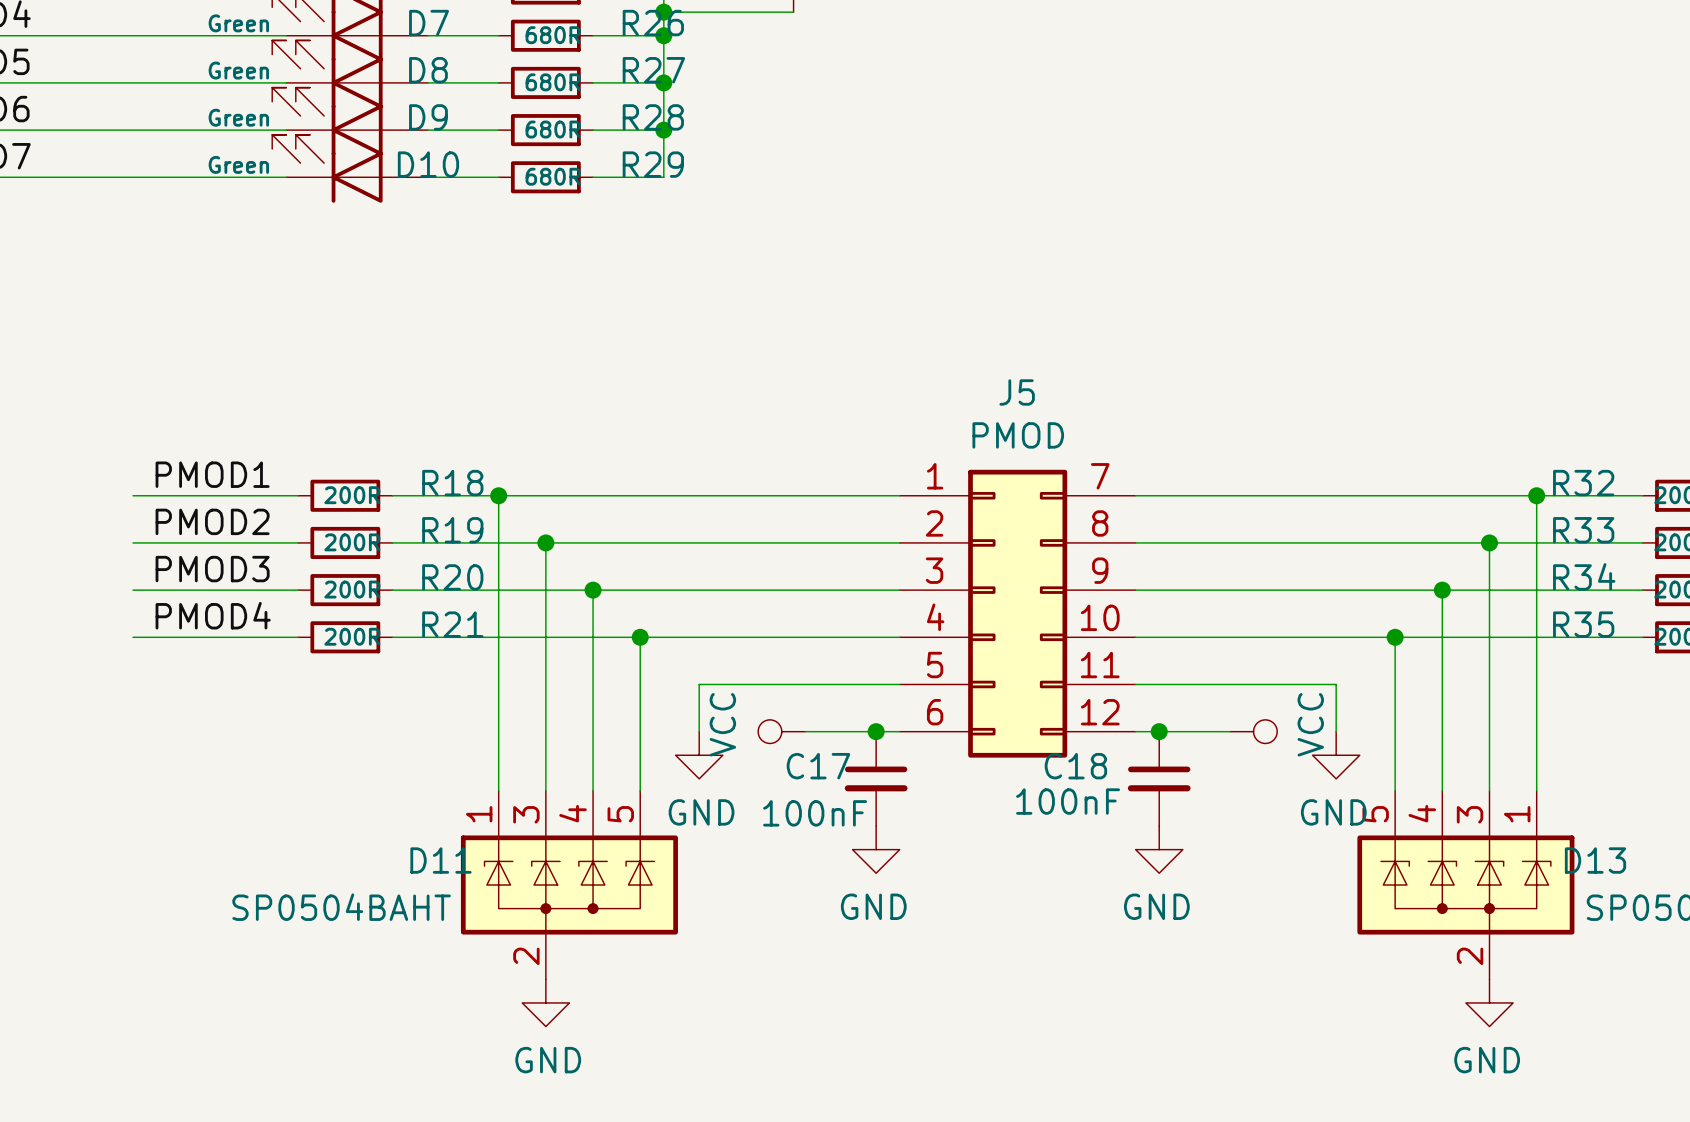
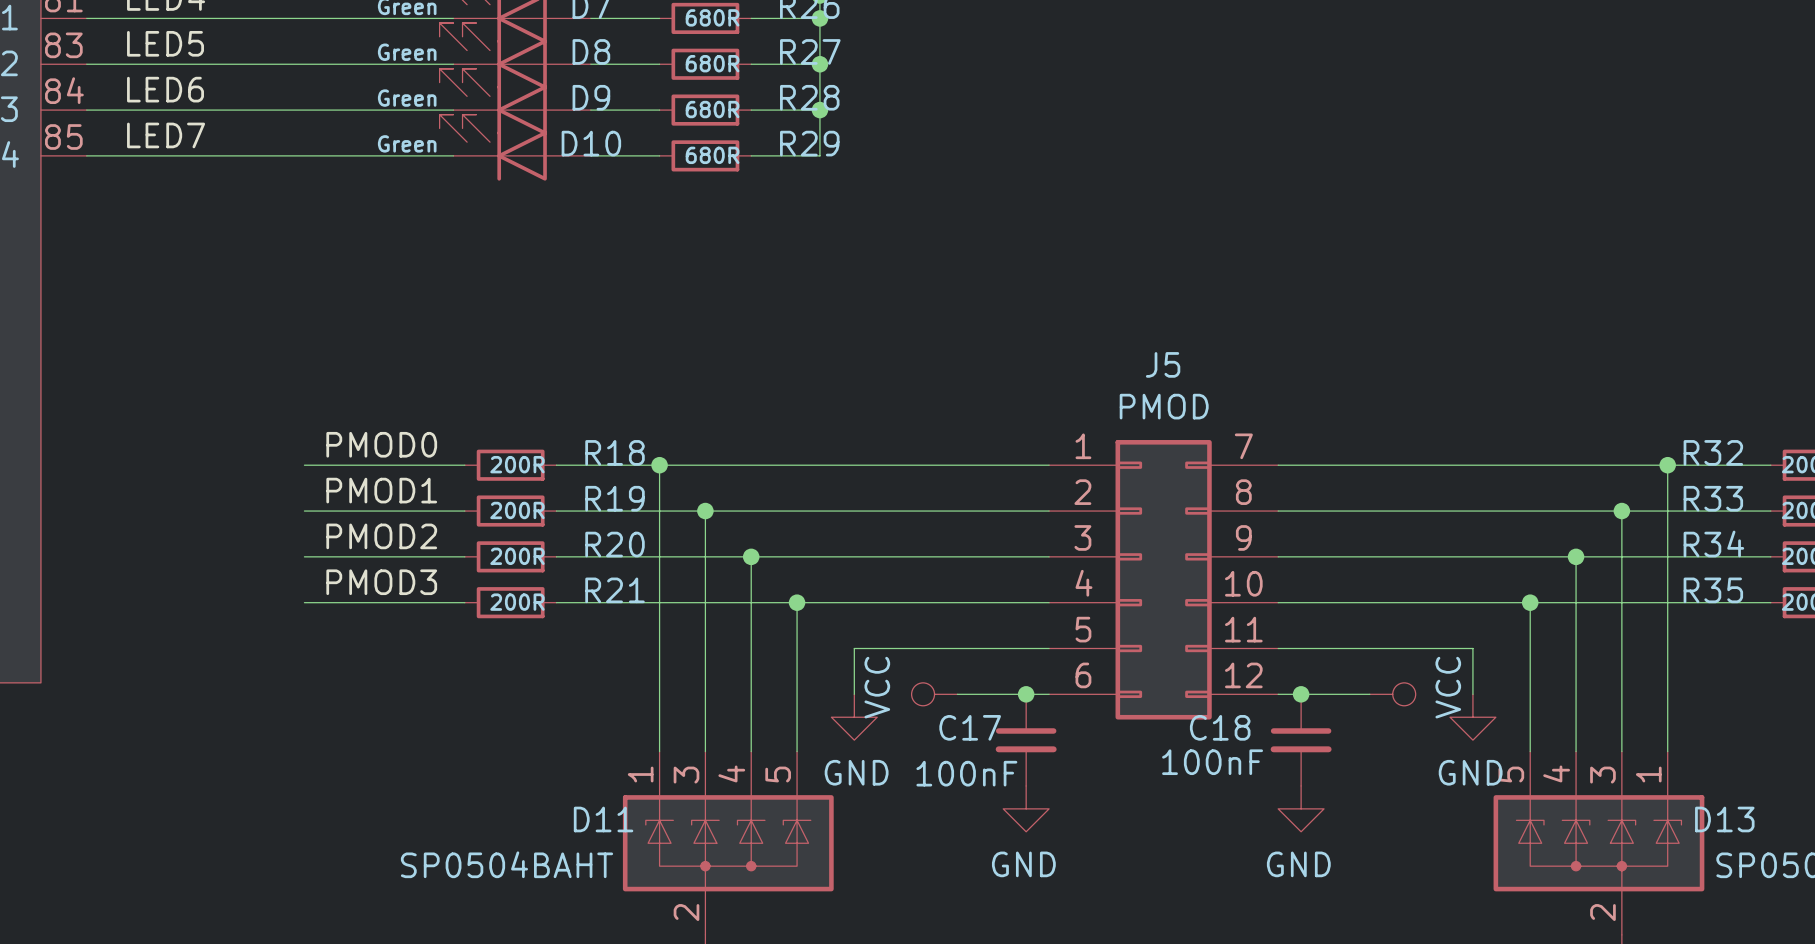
label: PMOD1 (212, 474) -> PMOD0 (381, 444)
label: PMOD2 (212, 521) -> PMOD1 (381, 490)
label: PMOD3 (212, 569) -> PMOD2 (381, 536)
label: PMOD4 (213, 615) -> PMOD3 (381, 582)

